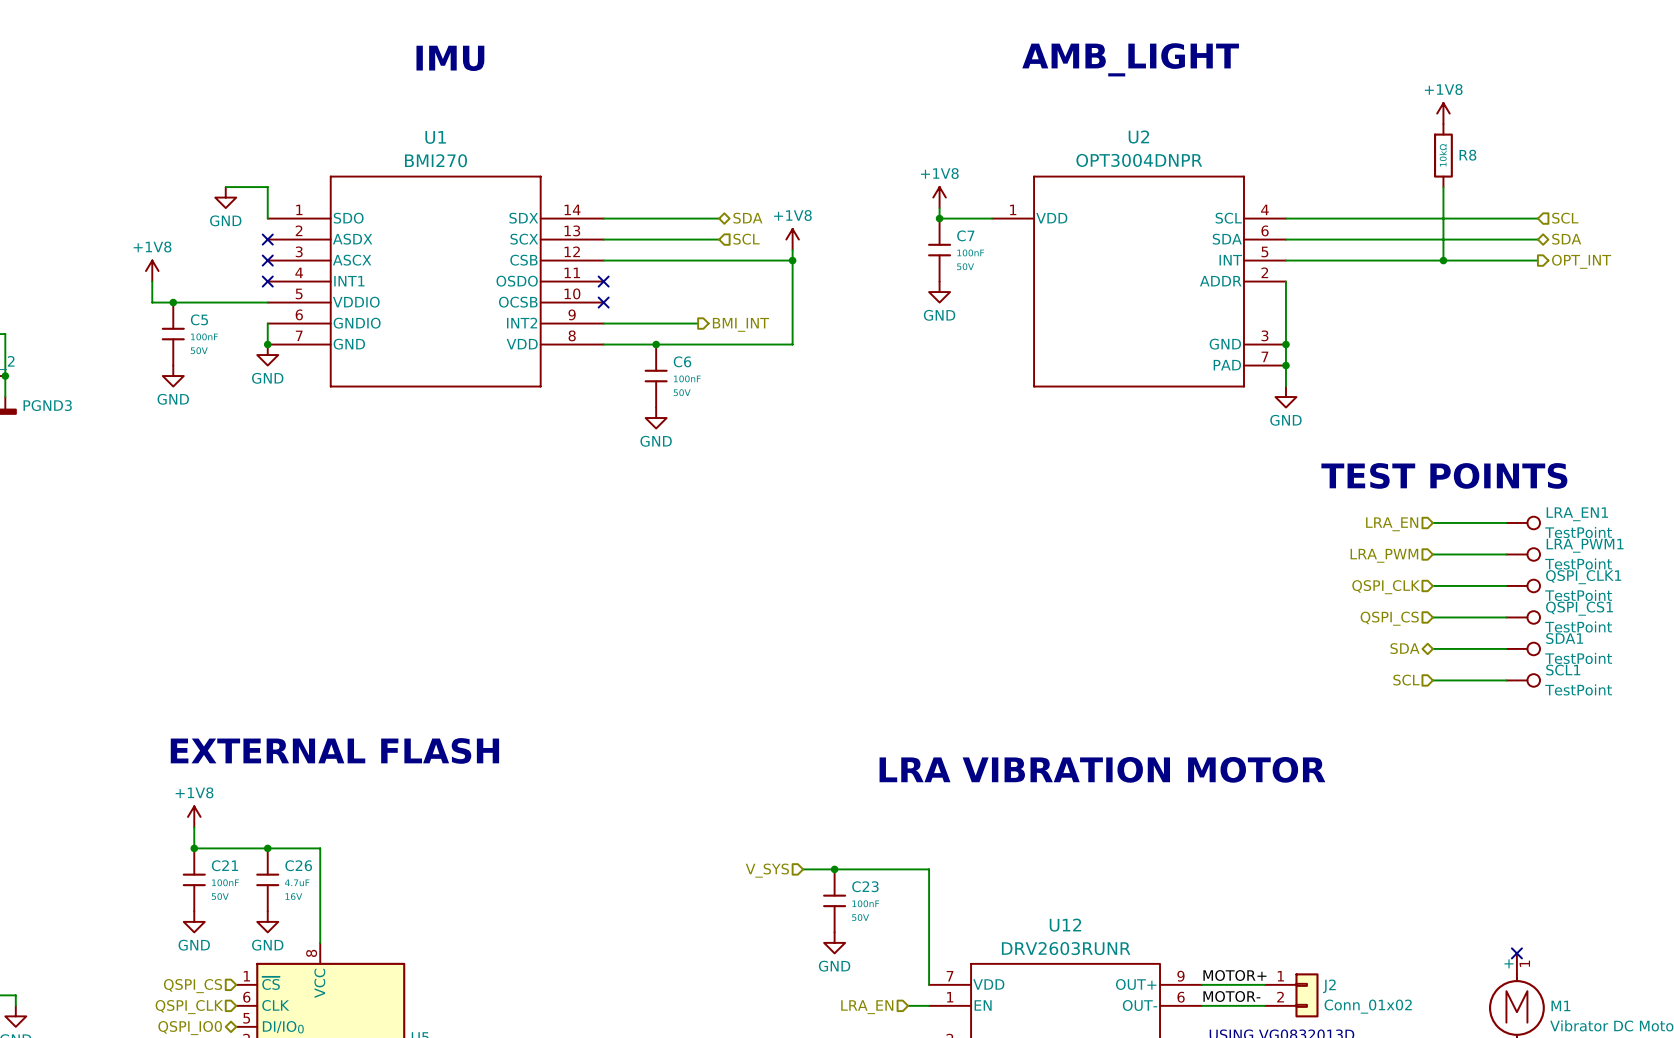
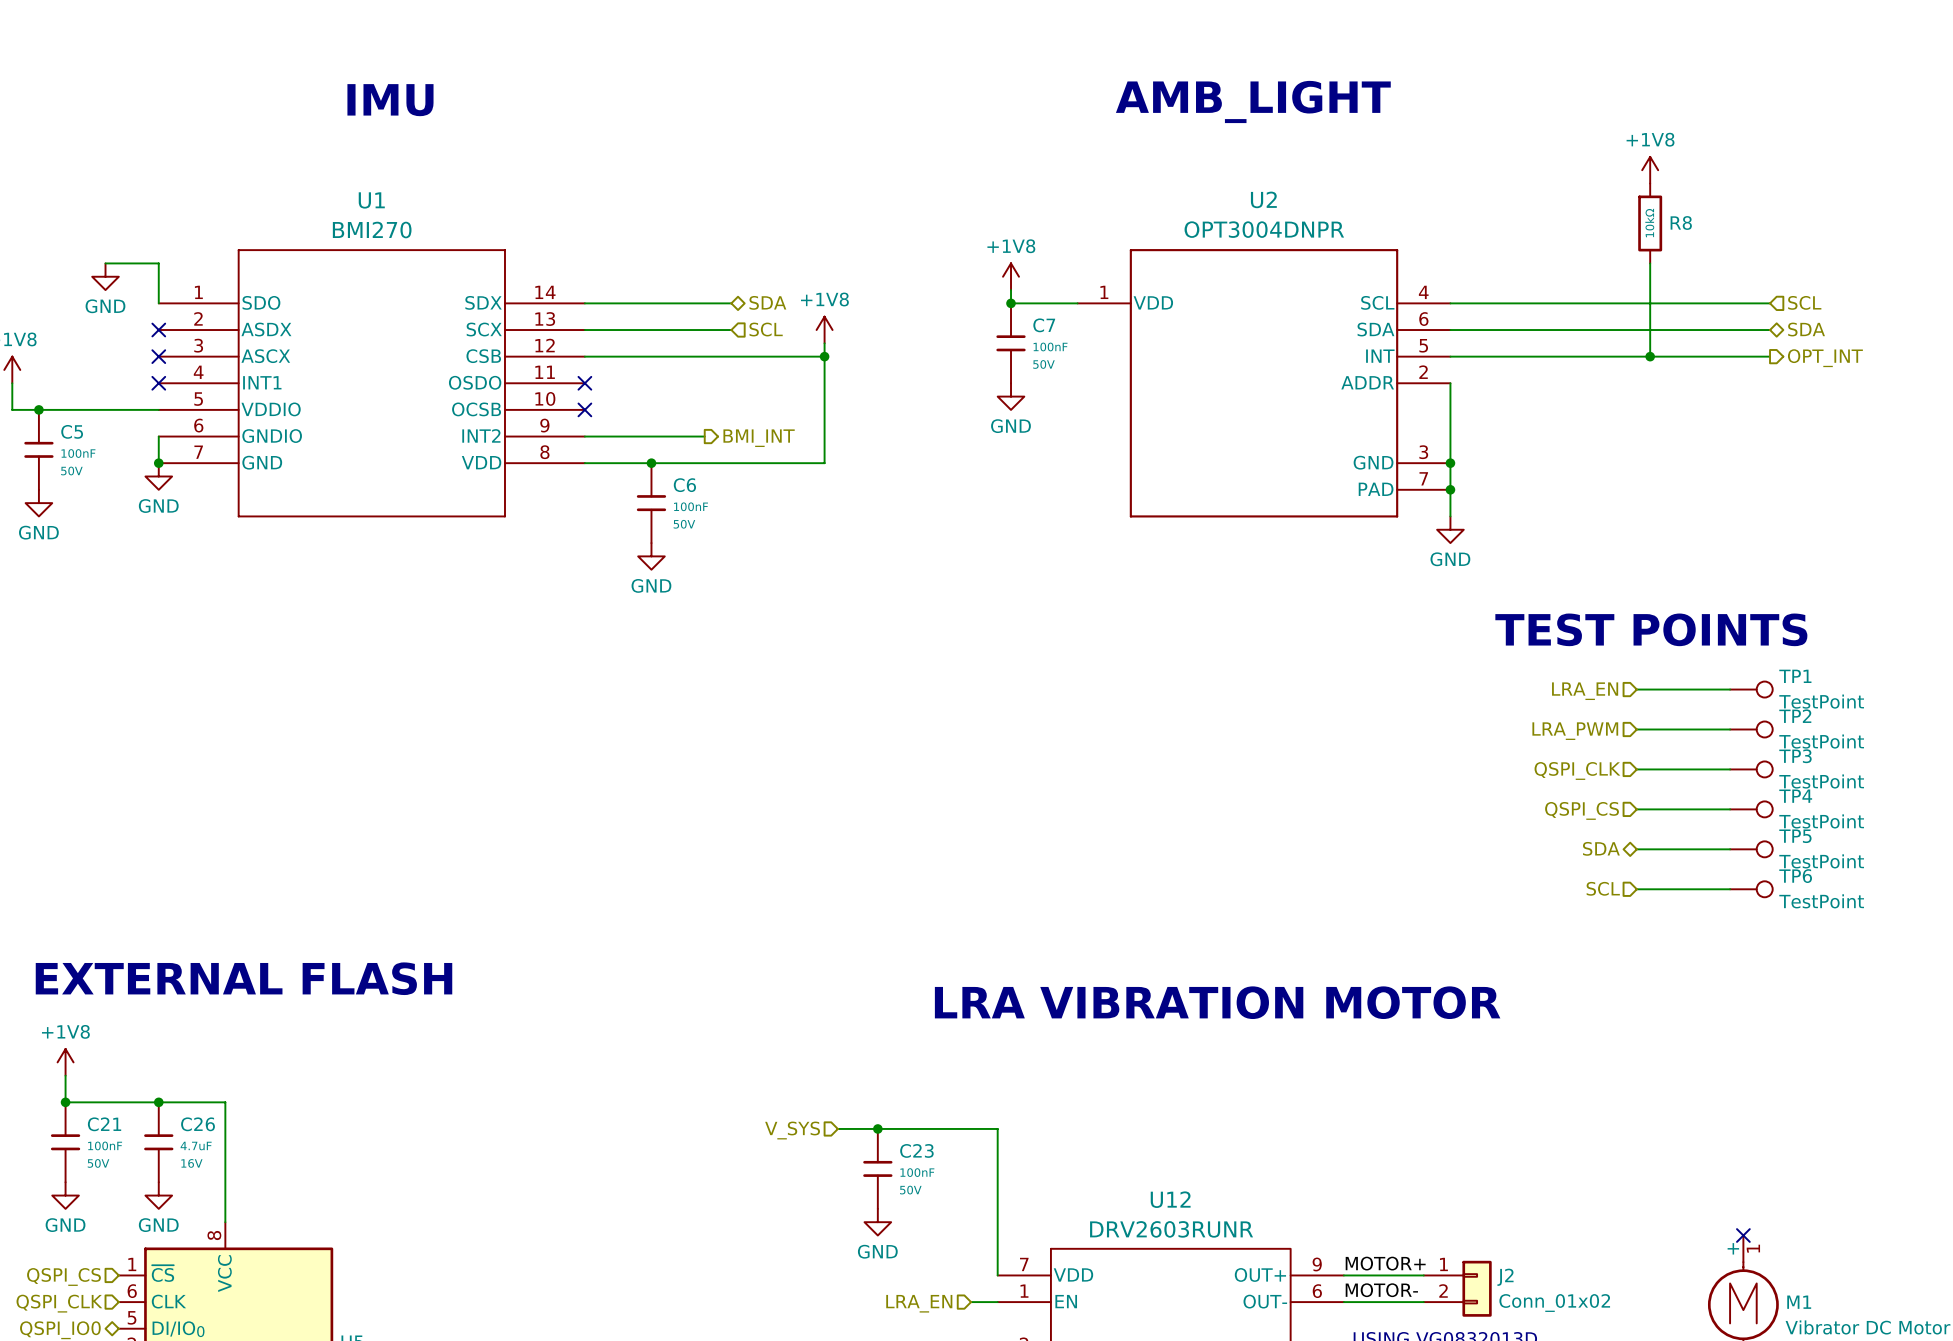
LRA_EN1 name: LRA_EN1 (1577, 514) -> TP1 (1795, 676)
LRA_PWM1 name: LRA_PWM1 (1585, 545) -> TP2 (1795, 716)
QSPI_CLK1 name: QSPI_CLK1 (1583, 577) -> TP3 (1795, 756)
QSPI_CS1 name: QSPI_CS1 (1579, 608) -> TP4 (1795, 796)
SDA1 name: SDA1 (1564, 638) -> TP5 (1795, 836)
SCL1 name: SCL1 (1563, 670) -> TP6 (1795, 876)

